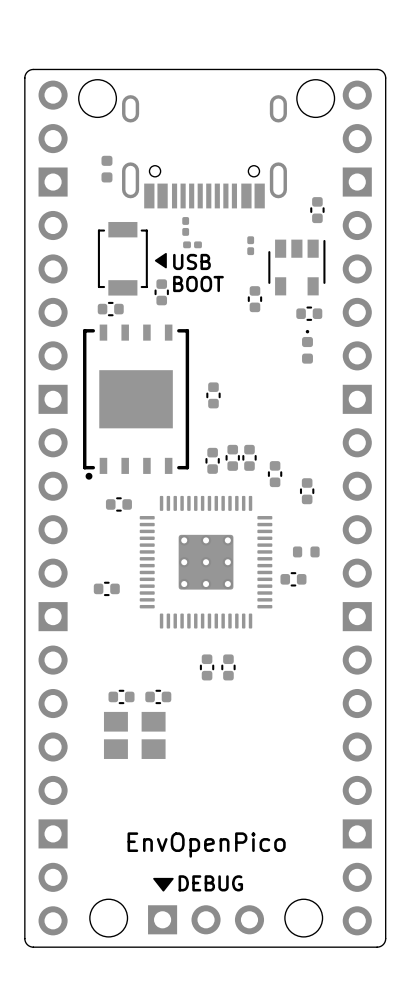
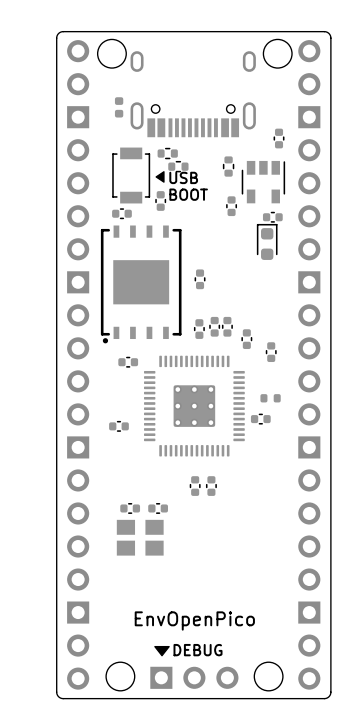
part: (185, 226) -> none
part: none -> (167, 153)
part footprint: [247, 236, 255, 256] -> [222, 156, 235, 177]
part footprint: [183, 241, 202, 249] -> [168, 160, 189, 173]
part footprint: [302, 329, 313, 364] -> [256, 223, 278, 260]

